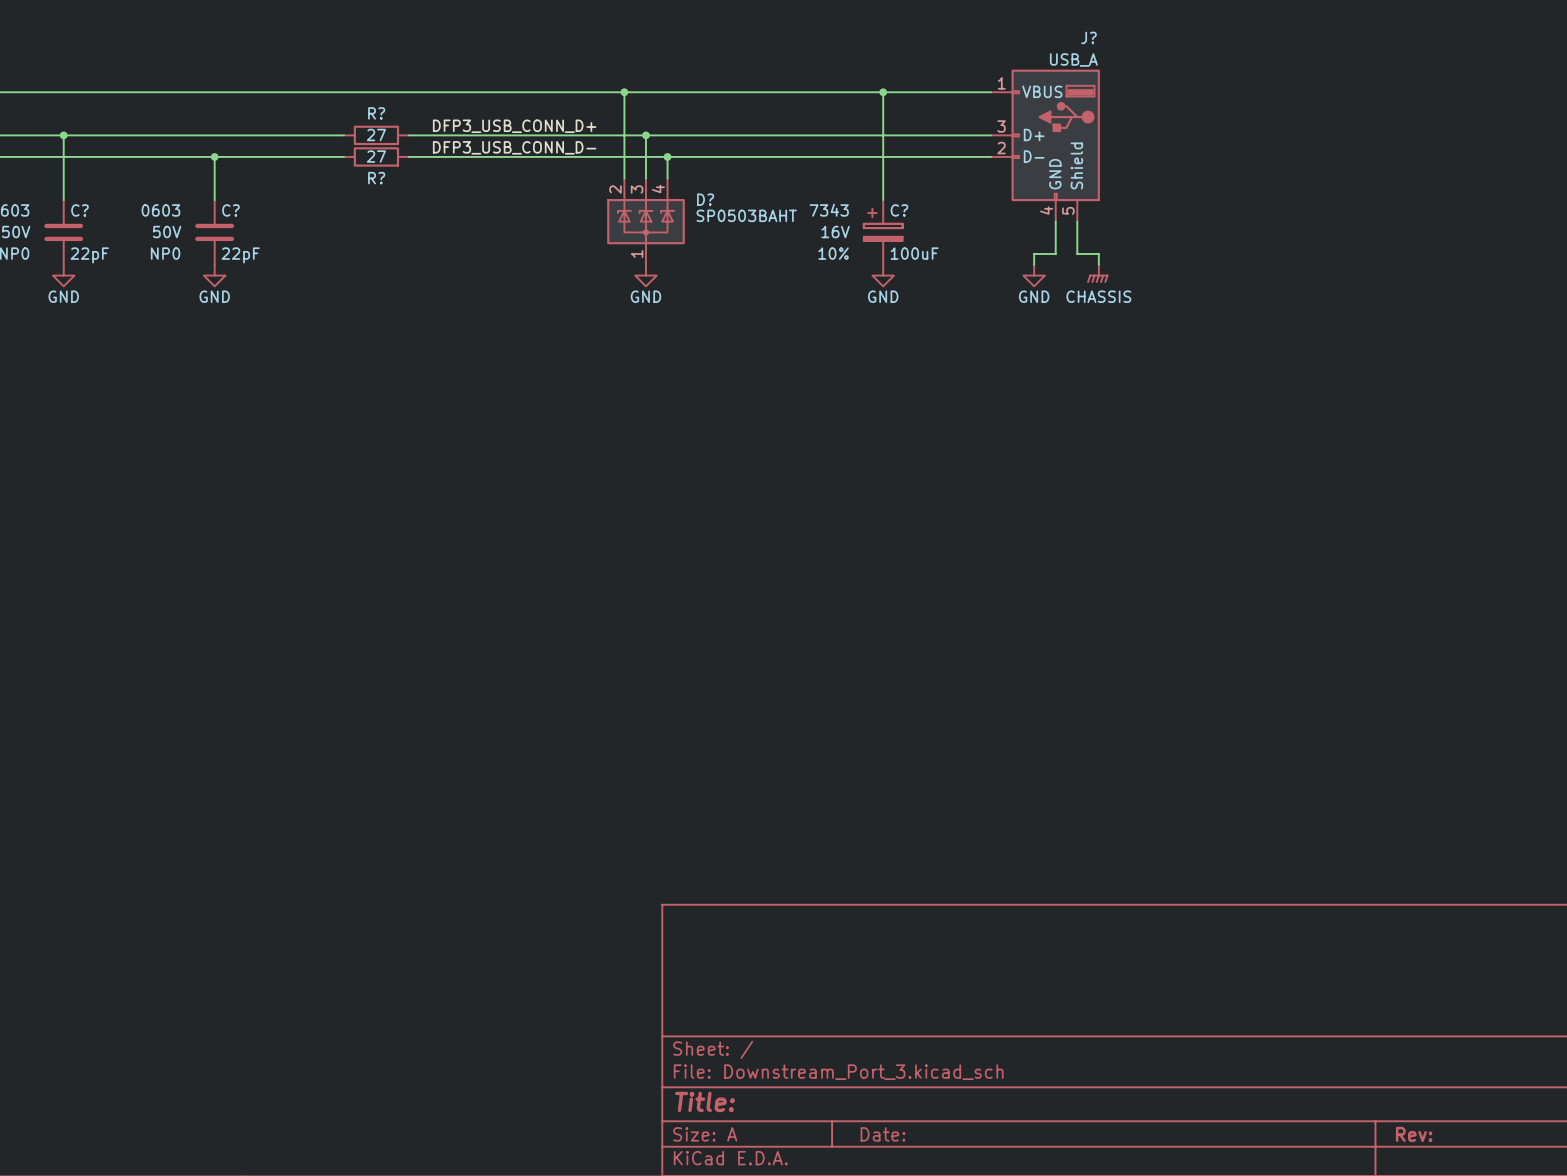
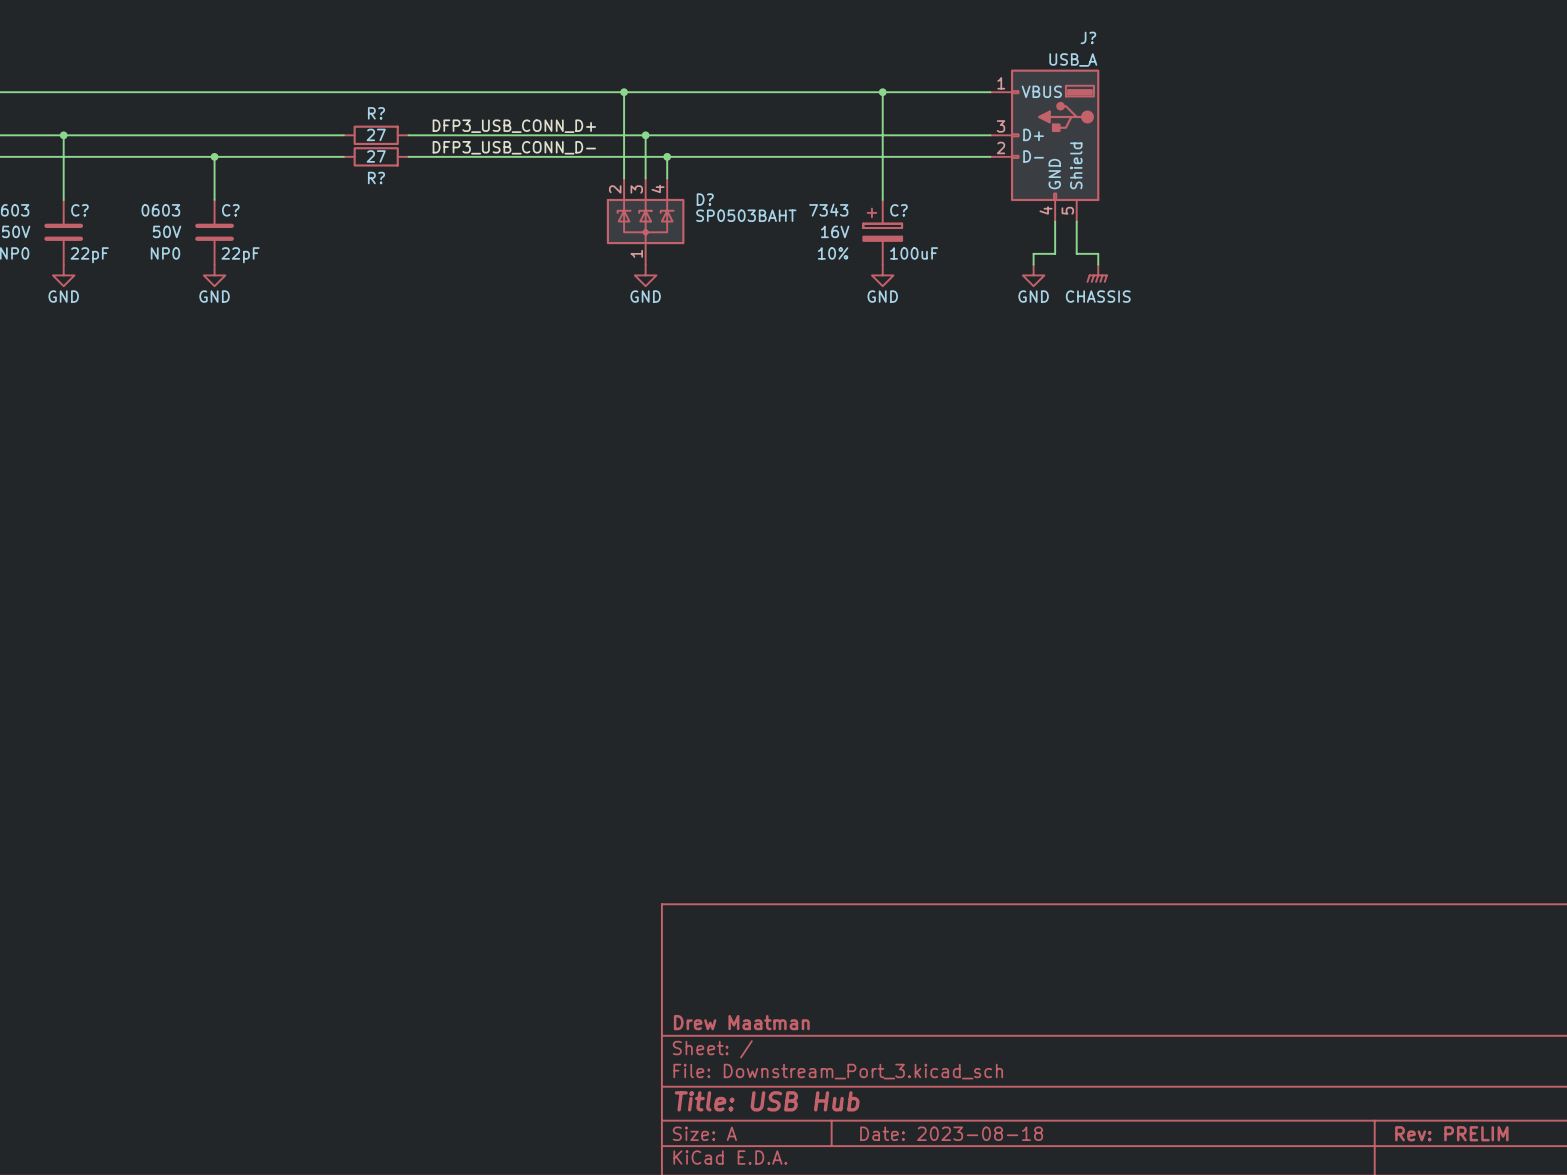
title block: none -> Drew Maatman (741, 1022)
title block: Title: (705, 1101) -> Title: USB Hub (767, 1101)
title block: Date: (882, 1134) -> Date: 2023-08-18 (951, 1133)
title block: Rev: (1414, 1134) -> Rev: PRELIM (1451, 1133)

